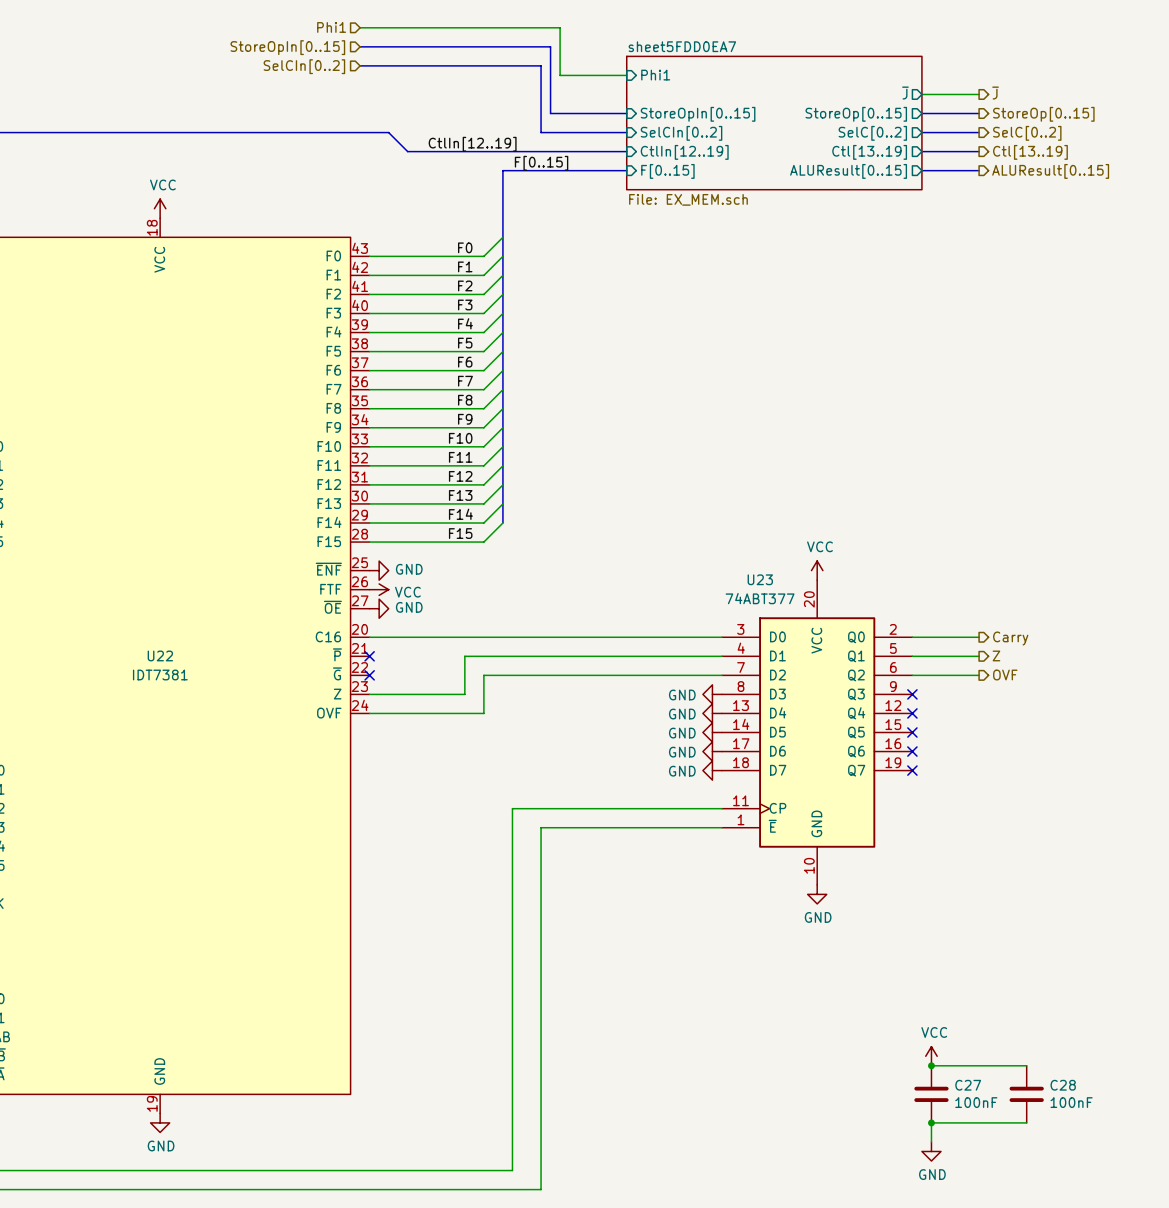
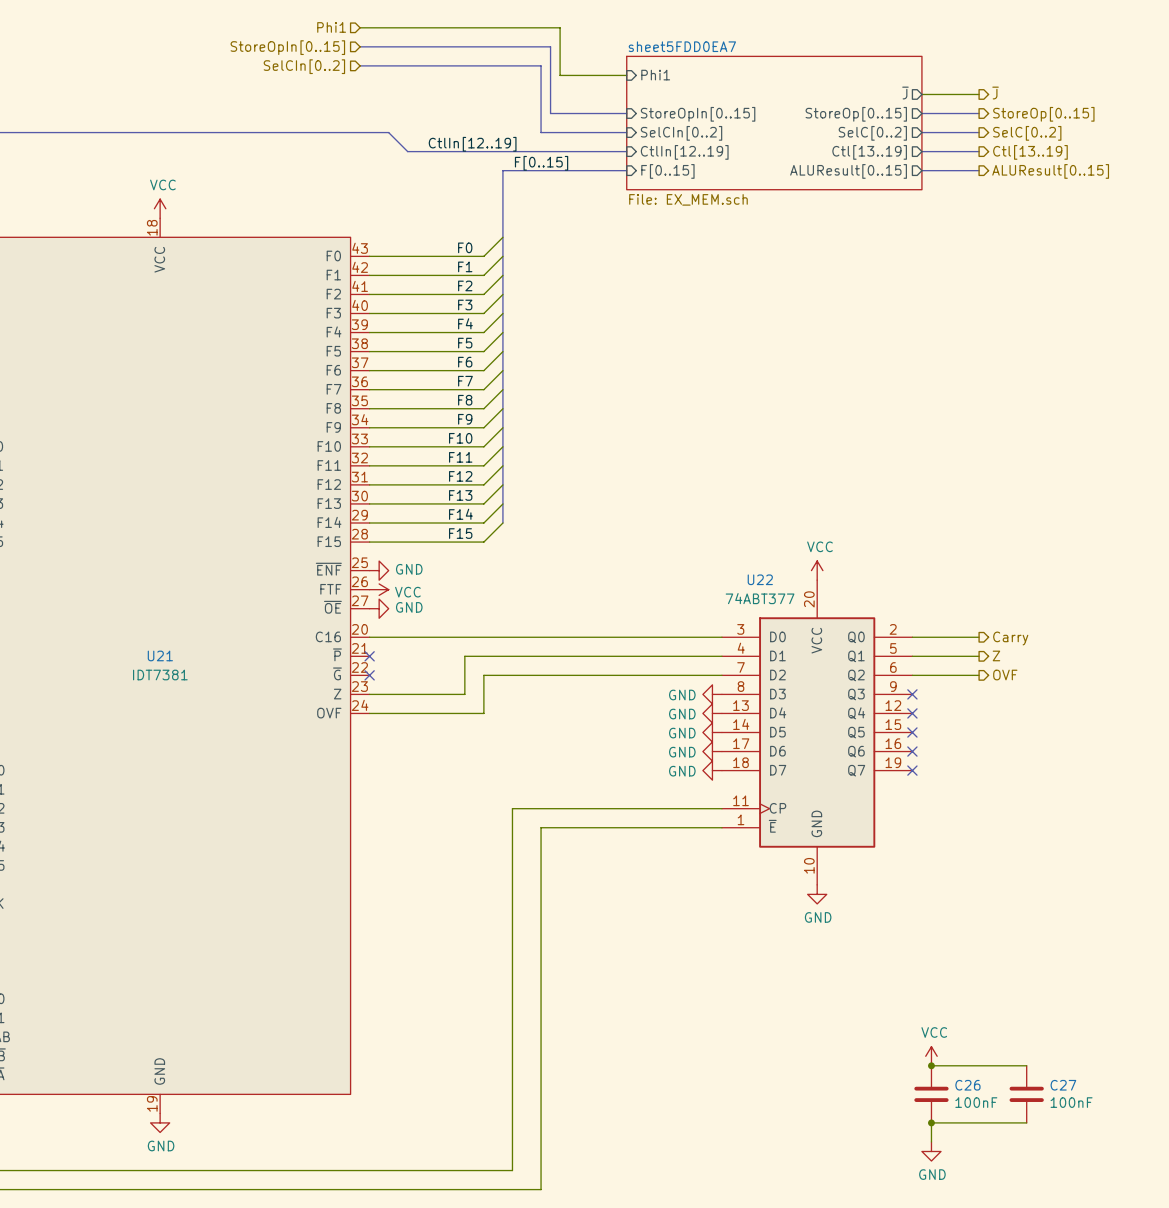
U23 name: U23 (760, 579) -> U22 (760, 579)
U22 name: U22 (160, 655) -> U21 (160, 655)
C27 name: C27 (968, 1085) -> C26 (967, 1085)
C28 name: C28 (1063, 1085) -> C27 (1063, 1085)

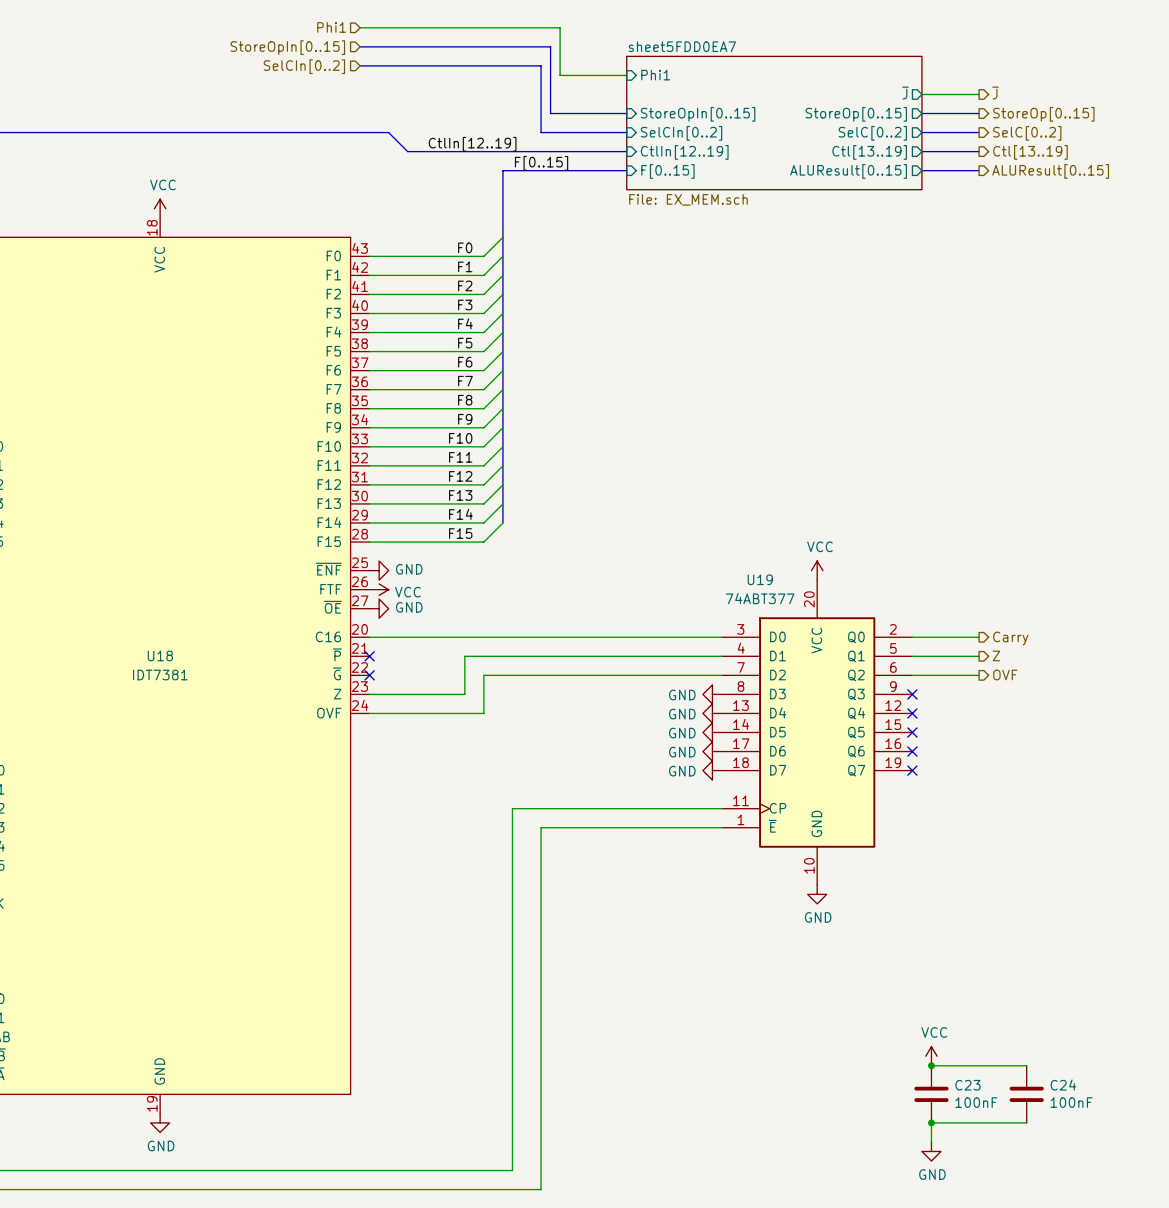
U22 name: U22 (760, 579) -> U19 (760, 579)
U21 name: U21 (160, 655) -> U18 (160, 655)
C26 name: C26 (967, 1085) -> C23 (967, 1085)
C27 name: C27 (1063, 1085) -> C24 (1063, 1085)

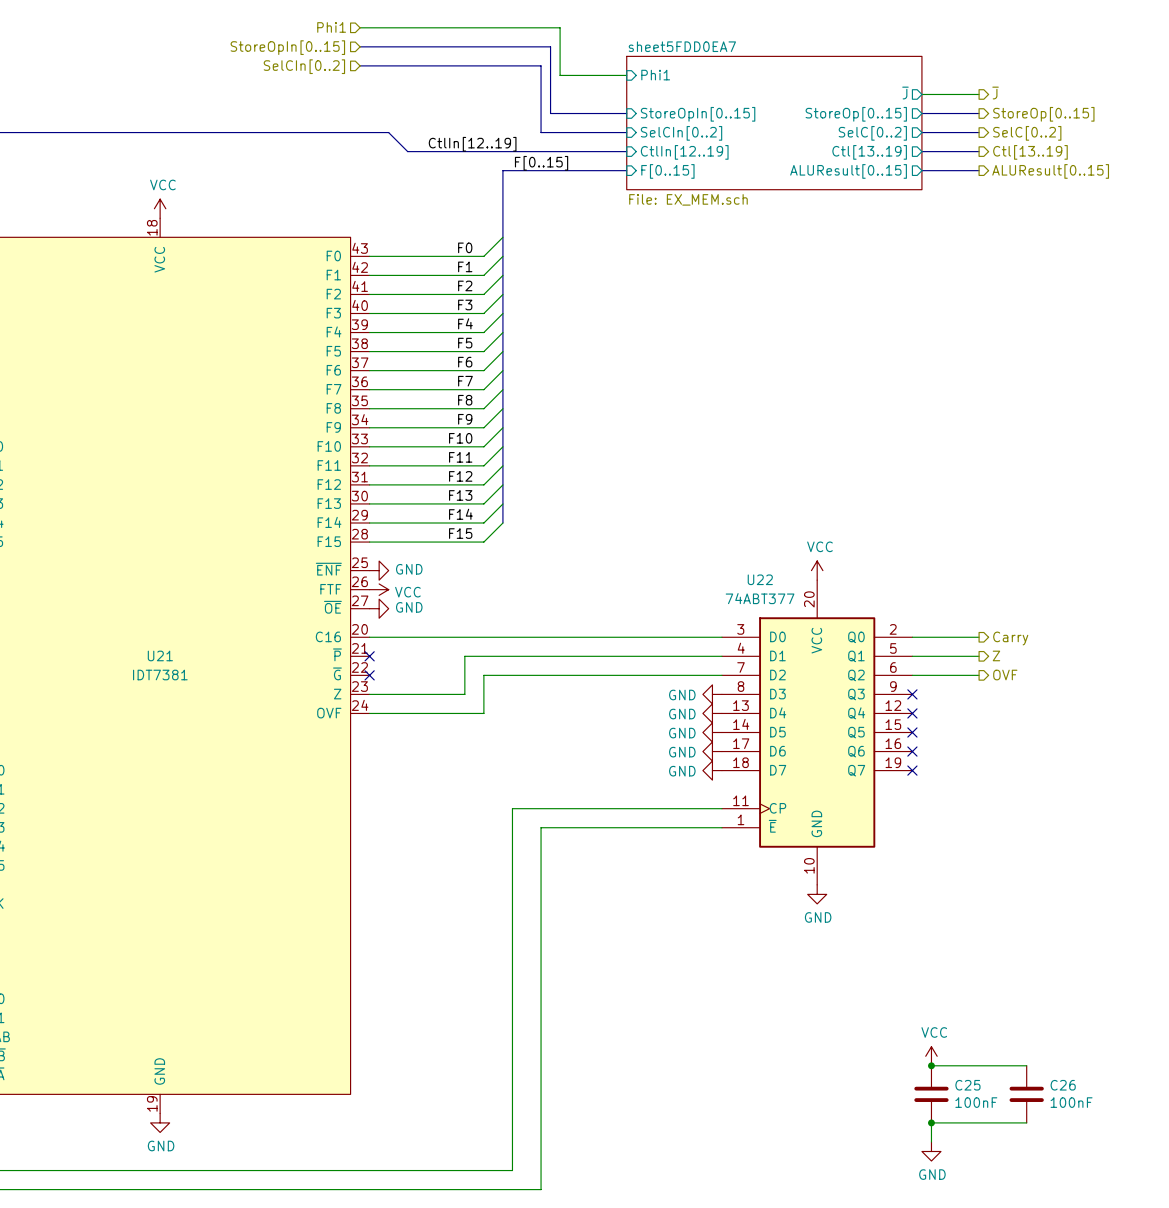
U19 name: U19 (760, 579) -> U22 (760, 579)
U18 name: U18 (160, 655) -> U21 (160, 655)
C23 name: C23 (967, 1085) -> C25 (967, 1085)
C24 name: C24 (1063, 1085) -> C26 (1063, 1085)

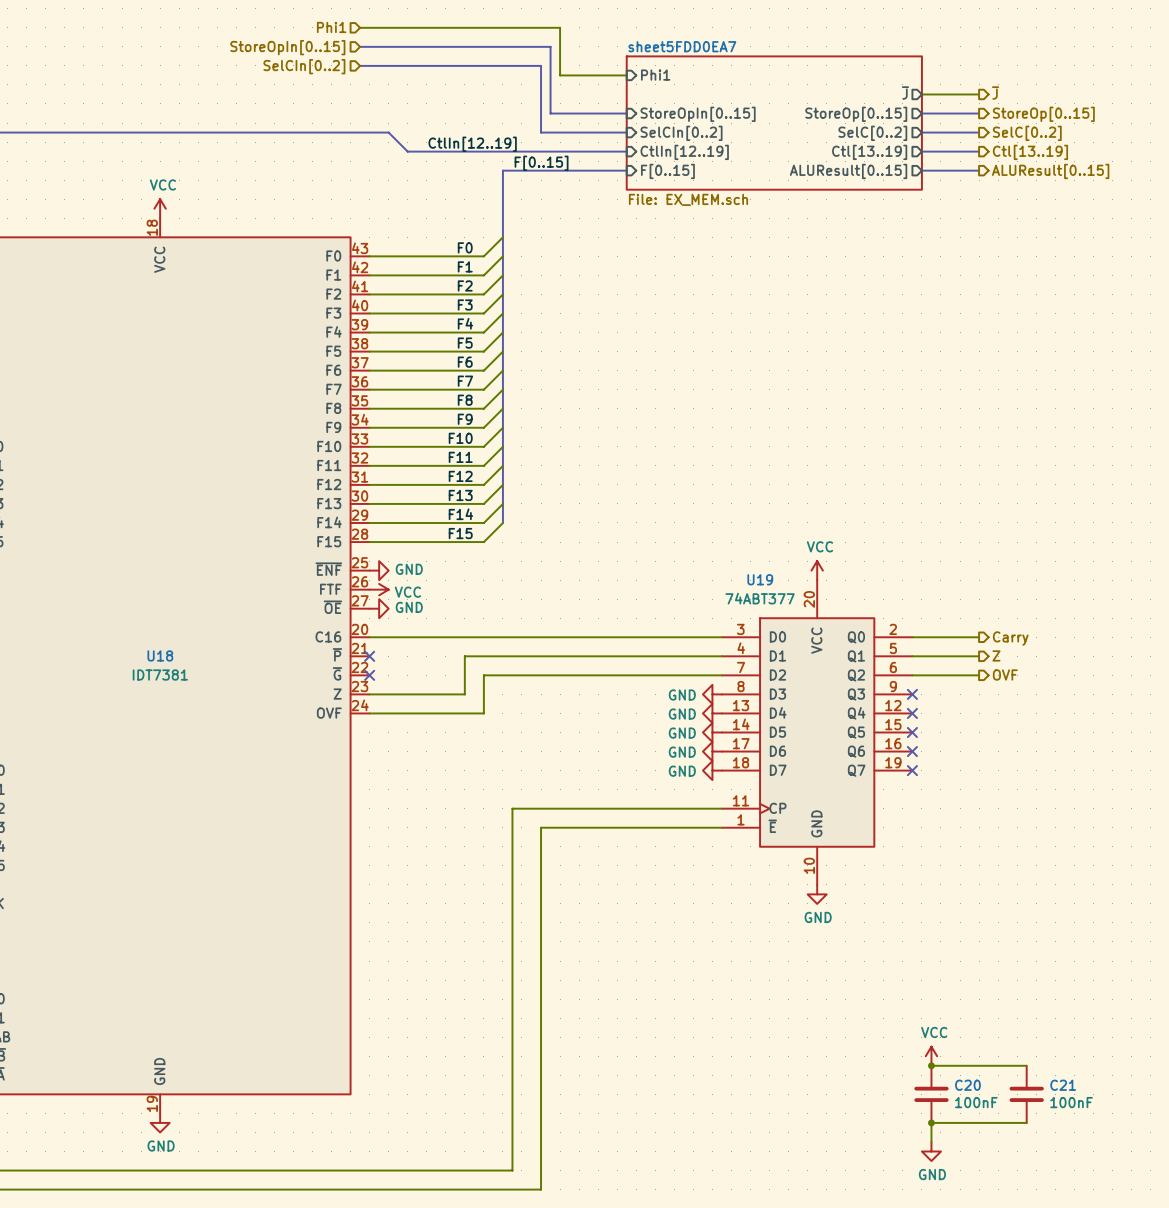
U22 name: U22 (760, 579) -> U19 (760, 579)
U21 name: U21 (160, 655) -> U18 (160, 655)
C25 name: C25 (967, 1085) -> C20 (967, 1085)
C26 name: C26 (1063, 1085) -> C21 (1063, 1085)

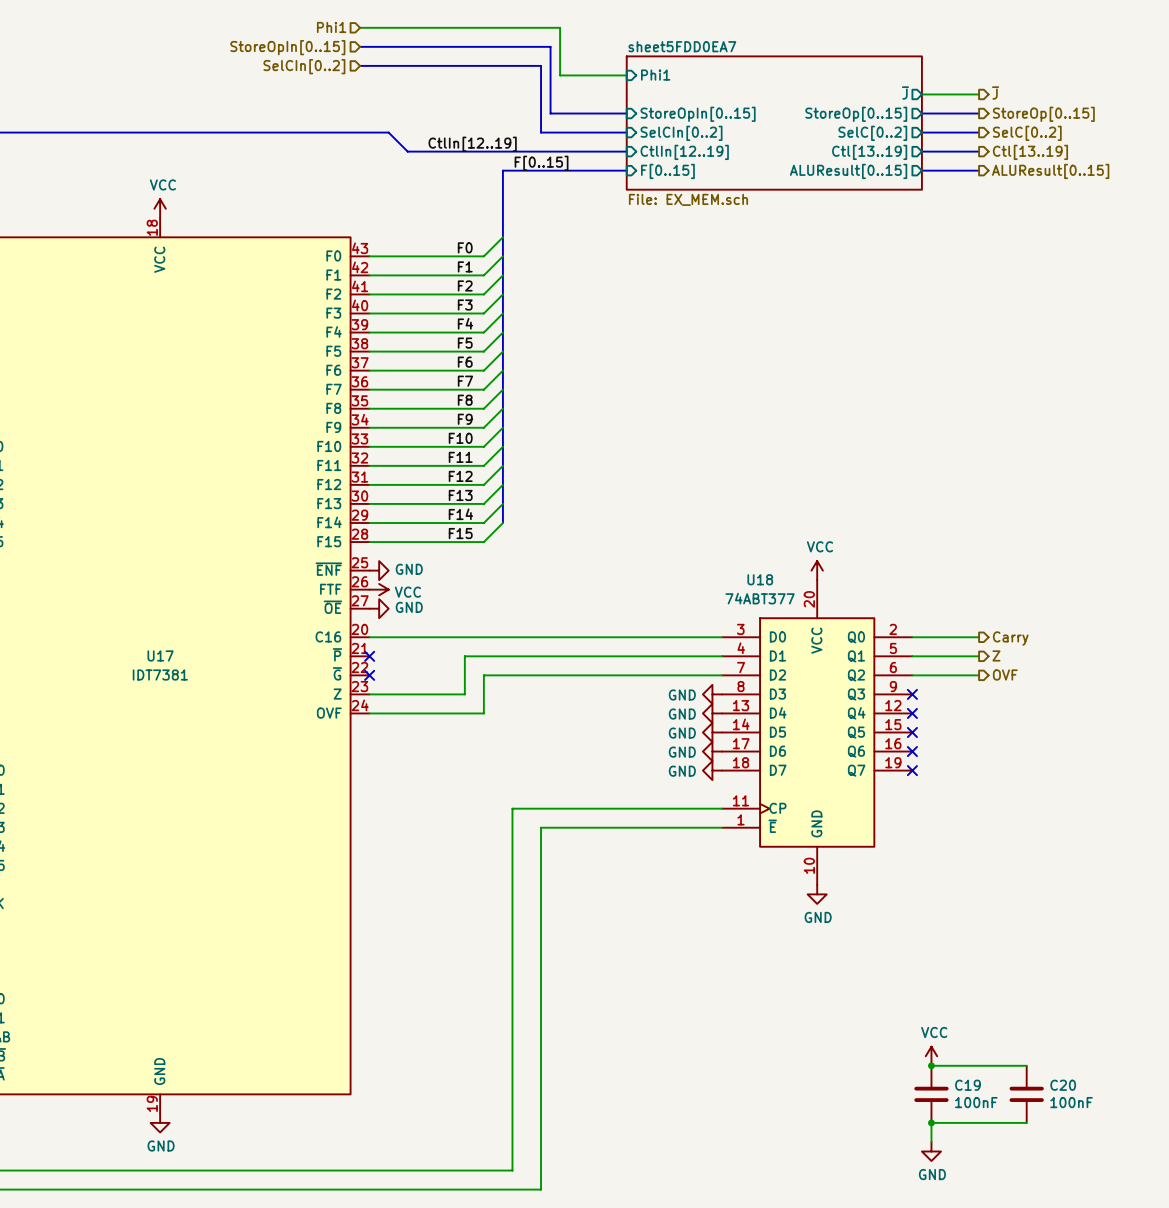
U19 name: U19 (760, 579) -> U18 (760, 579)
U18 name: U18 (160, 655) -> U17 (160, 655)
C20 name: C20 (967, 1085) -> C19 (967, 1085)
C21 name: C21 (1063, 1085) -> C20 (1063, 1085)

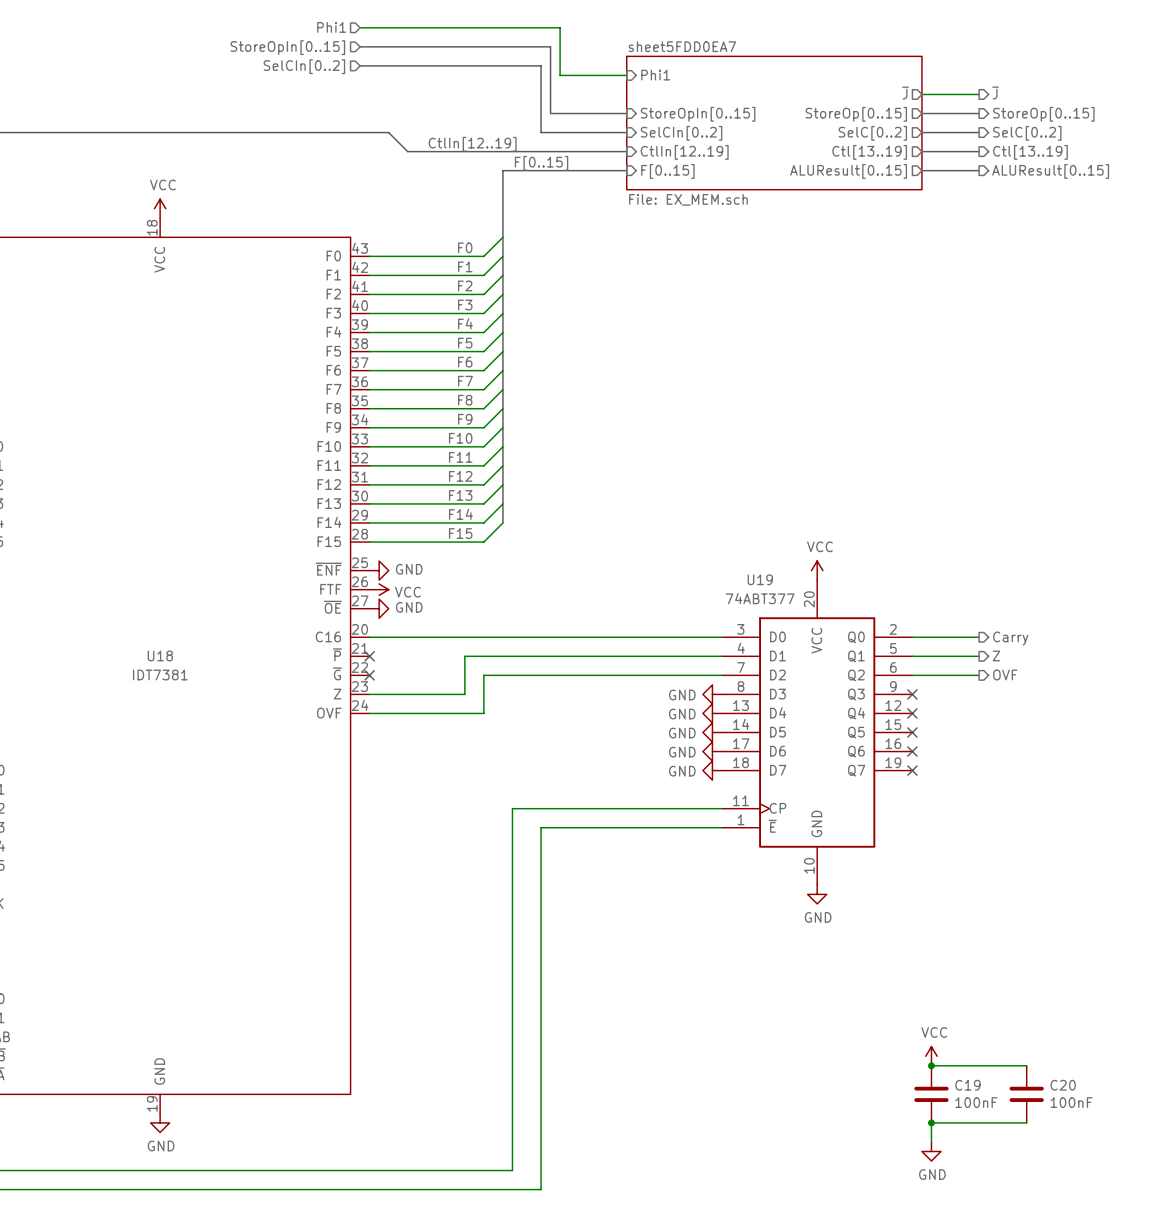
U18 name: U18 (760, 579) -> U19 (760, 579)
U17 name: U17 (160, 655) -> U18 (160, 655)

